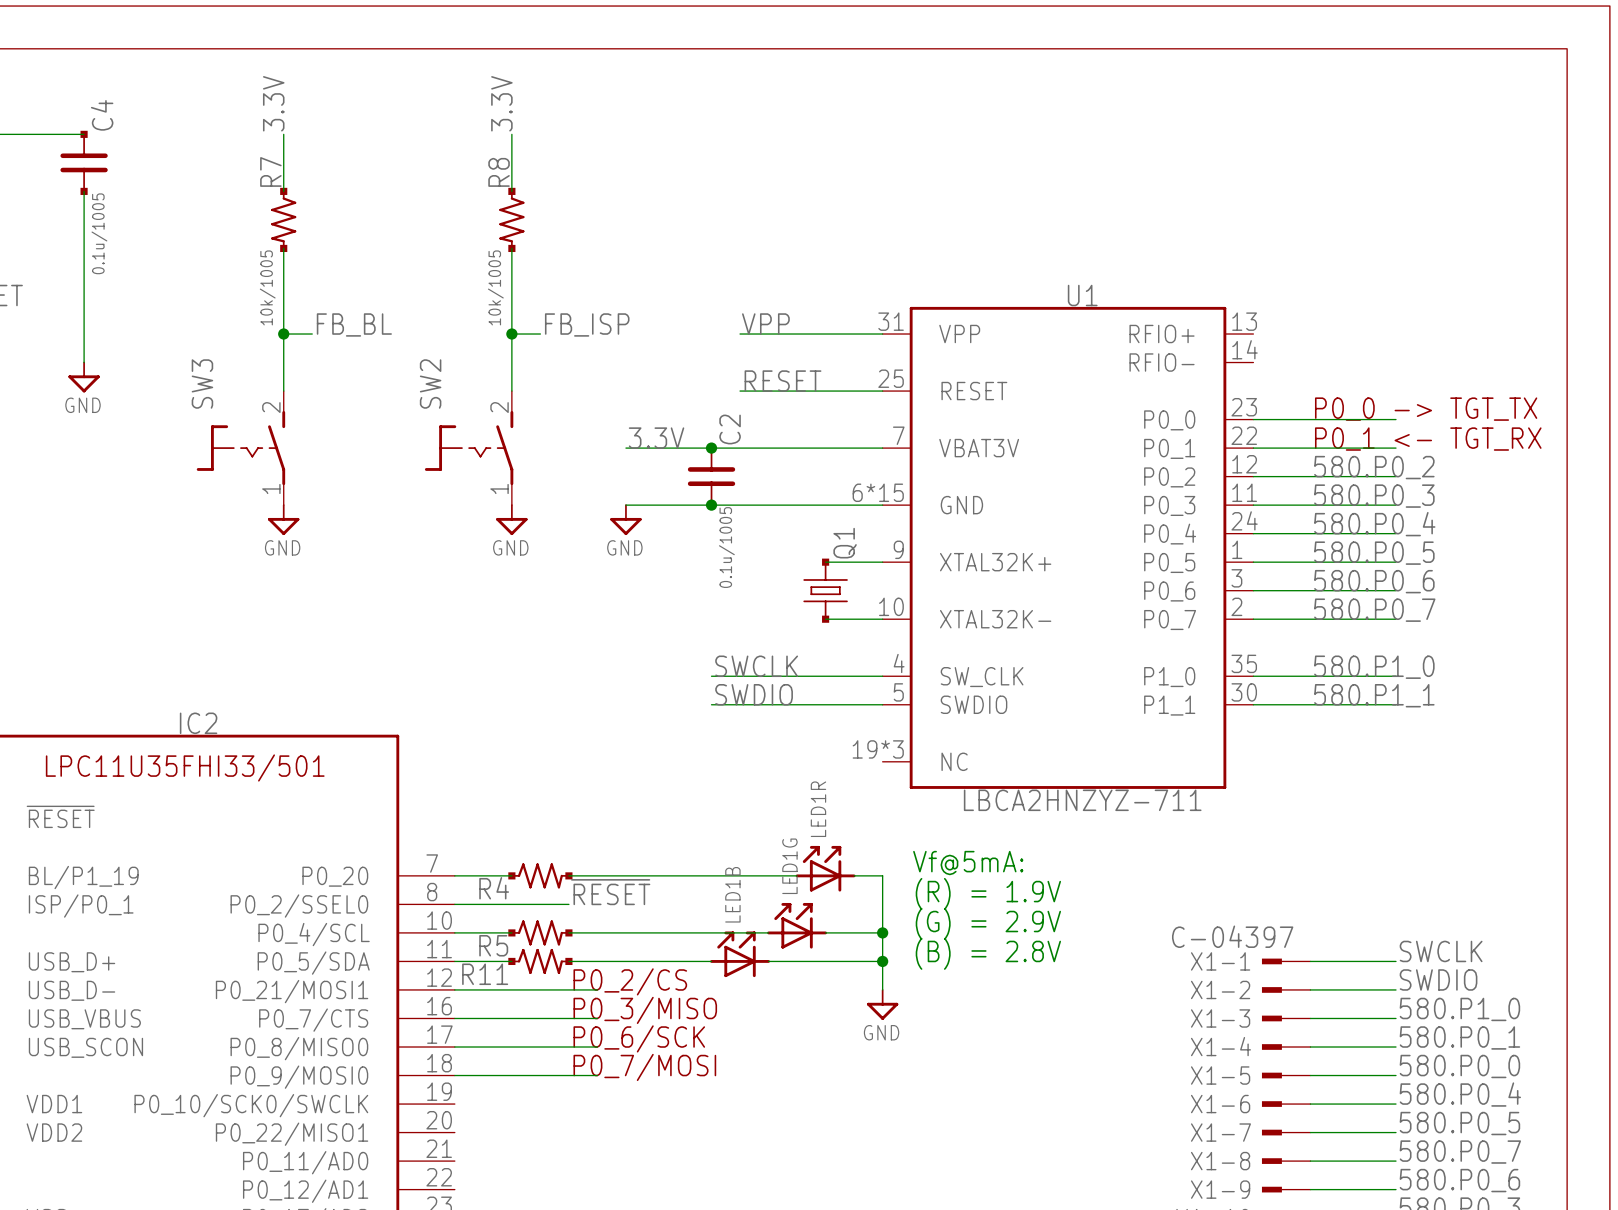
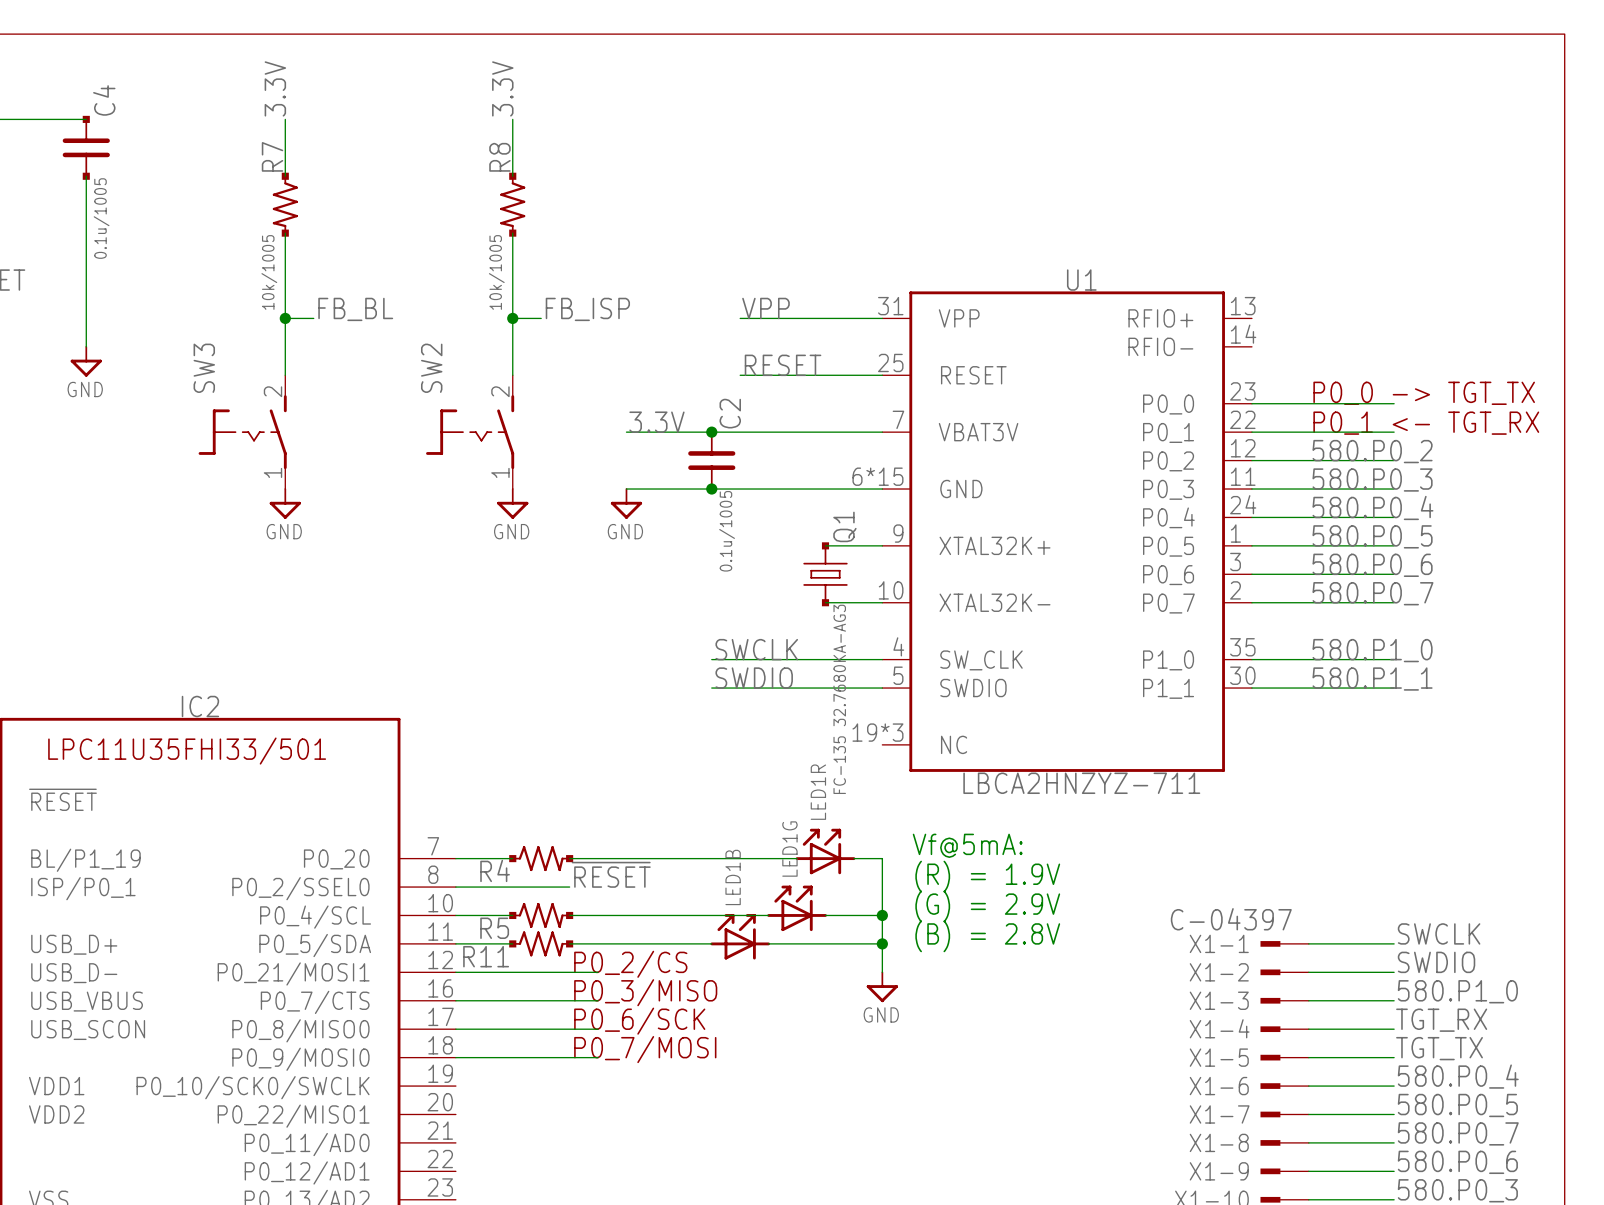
Q1 value: none -> FC-135 32.7680KA-AG3 (839, 699)
label: 580.P0_1 (1459, 1037) -> TGT_RX (1441, 1020)
label: 580.P0_0 (1459, 1066) -> TGT_TX (1439, 1048)

